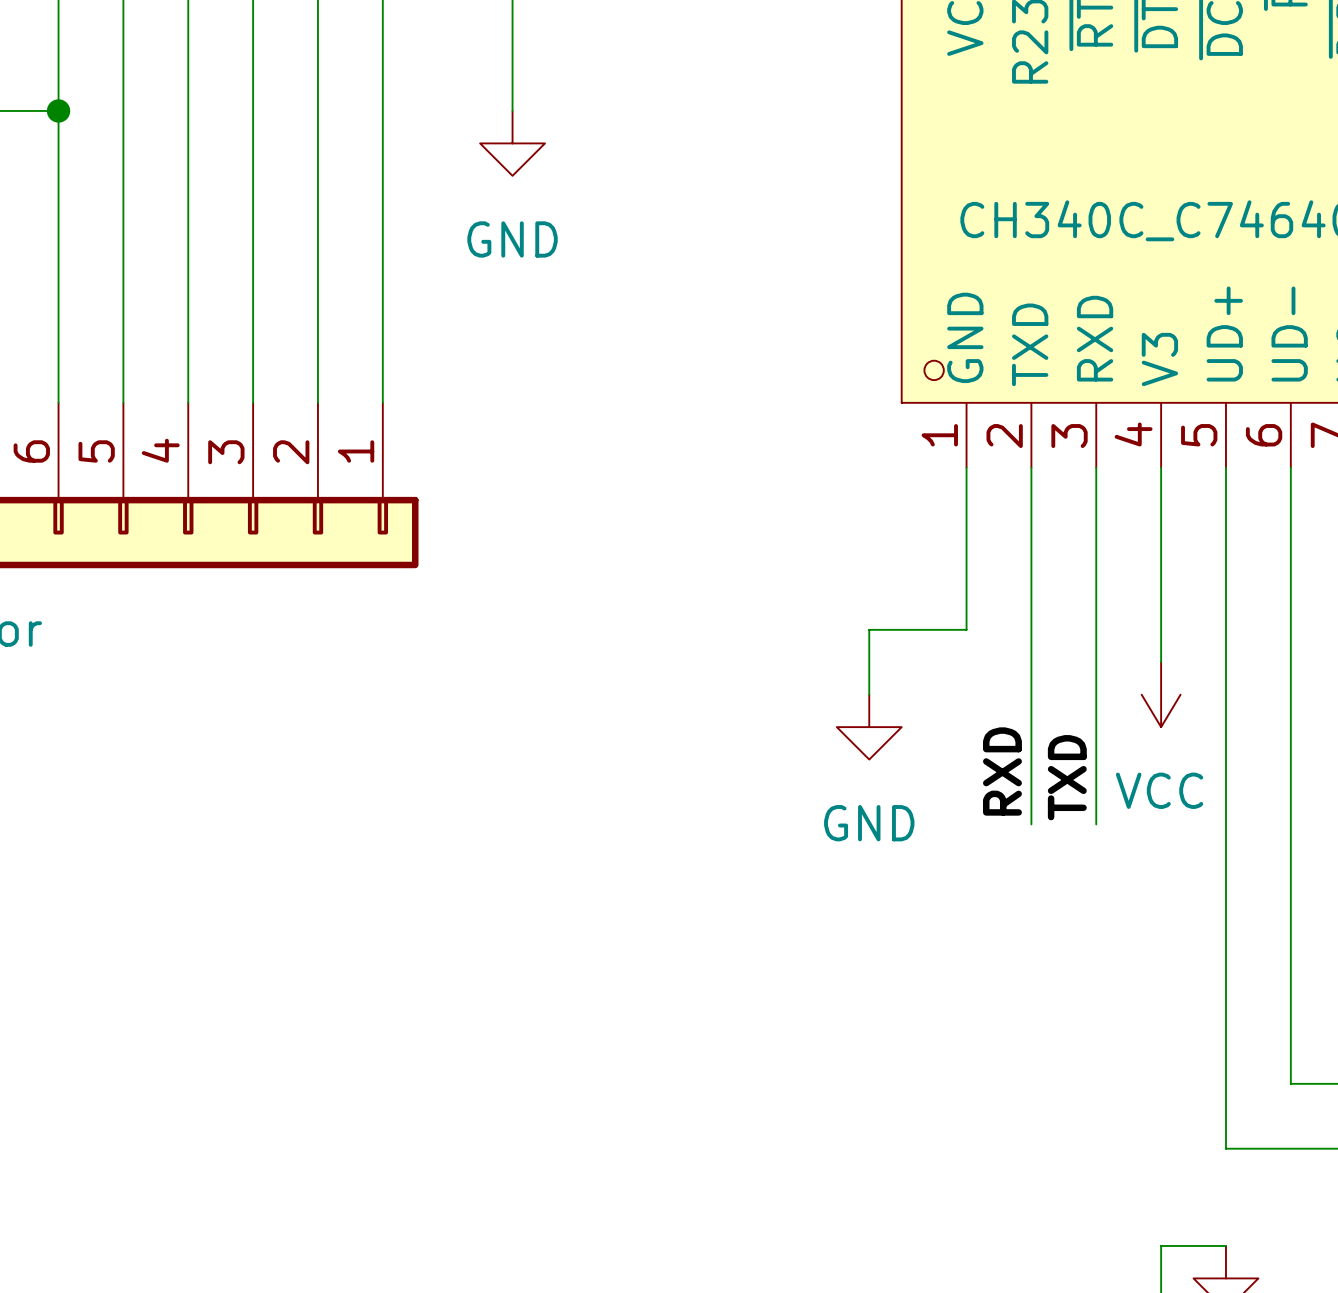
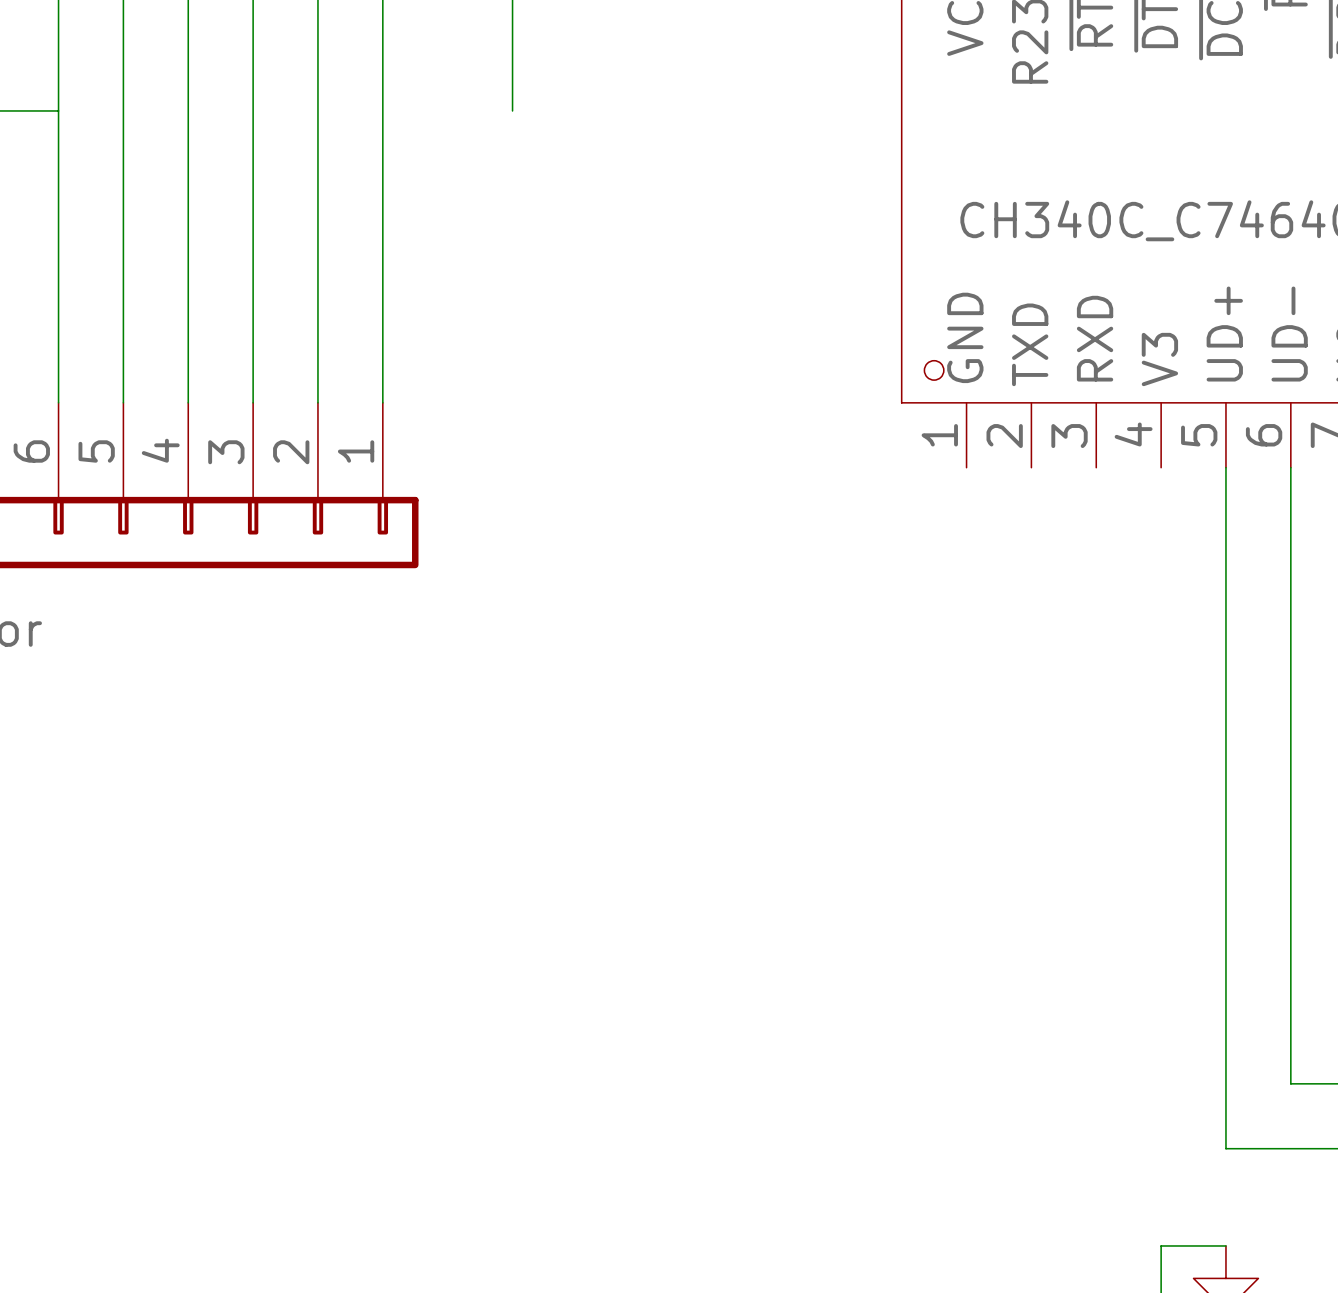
junction: (58, 110) -> none
power symbol: GND (512, 143) -> none
wire: (966, 467) (966, 629) (869, 629) (869, 694) -> none
wire: (1031, 467) (1031, 824) -> none
wire: (1096, 467) (1096, 824) -> none
wire: (1161, 467) (1161, 662) -> none
power symbol: VCC (1161, 694) -> none
power symbol: GND (869, 727) -> none
label: RXD (1002, 771) -> none
label: TXD (1067, 777) -> none

